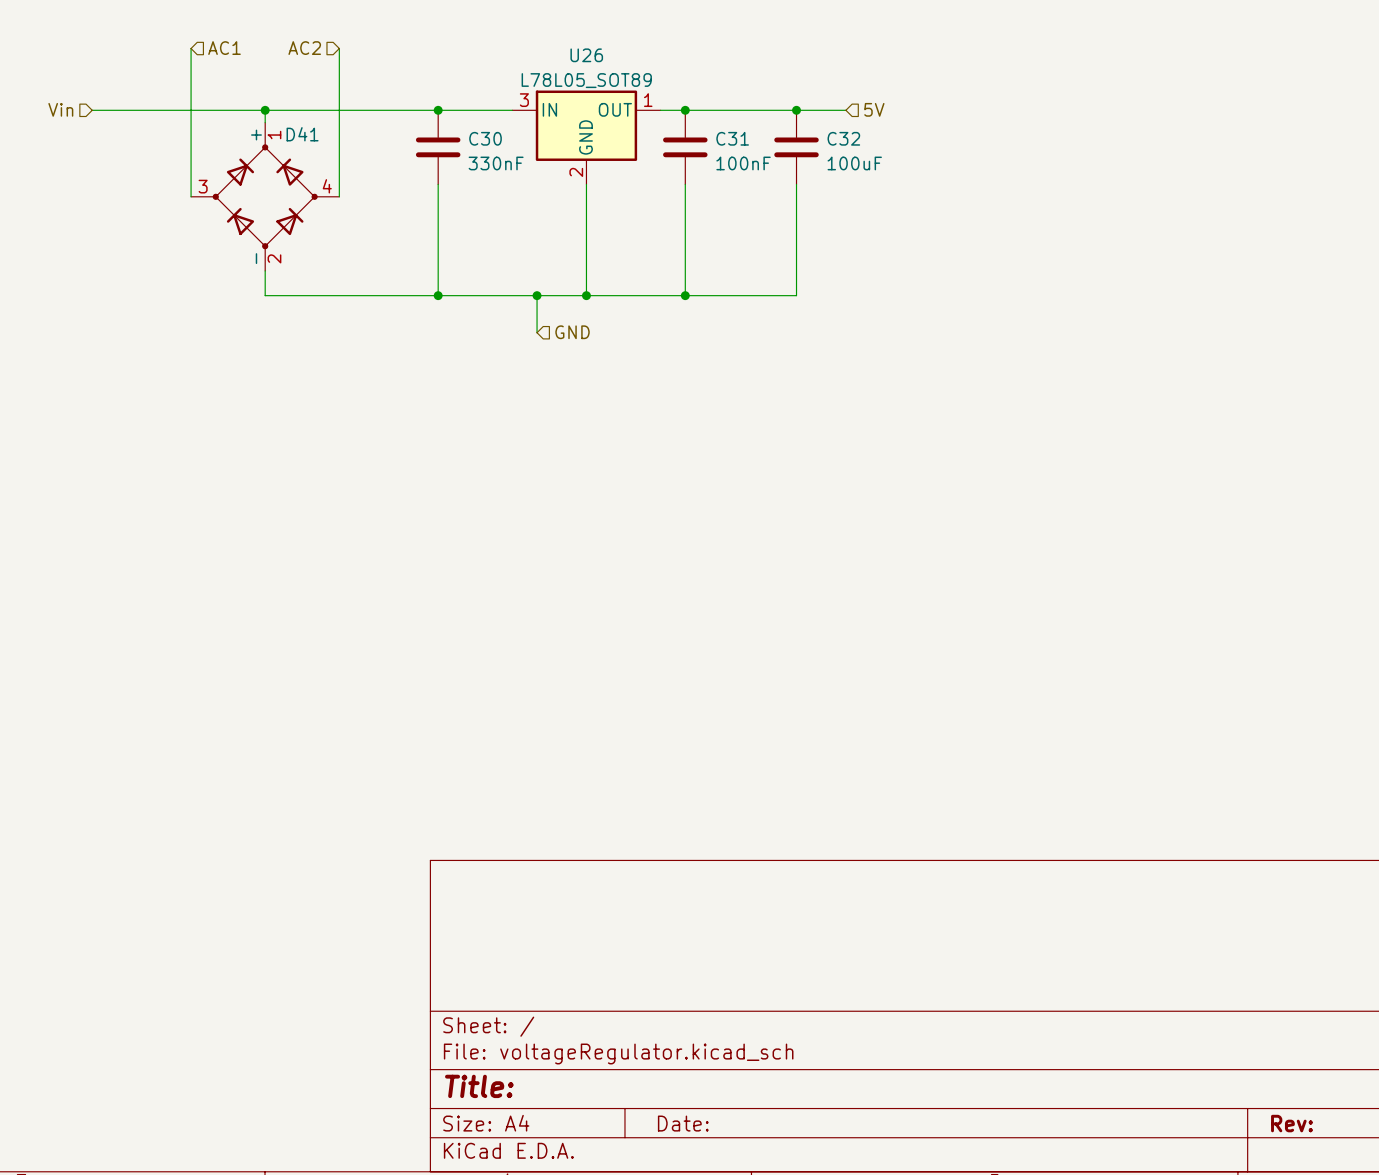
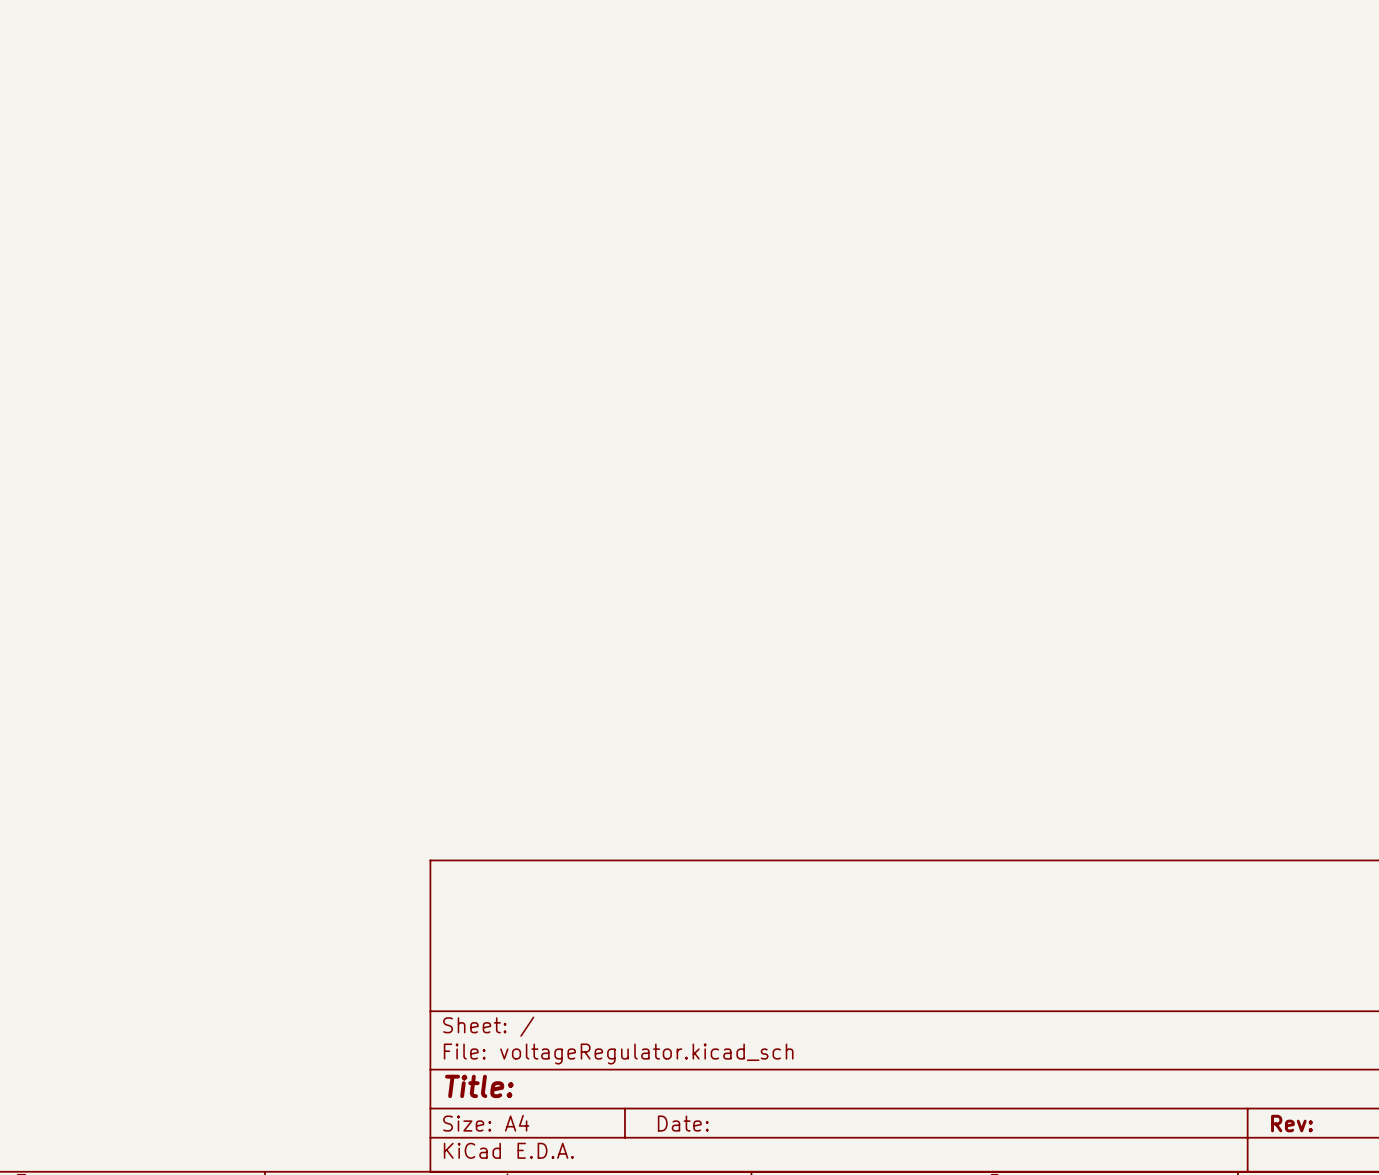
wire: (191, 48) (191, 196) -> none
hierarchical label: AC1 (224, 48) -> none
hierarchical label: AC2 (304, 48) -> none
wire: (339, 48) (339, 196) -> none
hierarchical label: Vin (60, 109) -> none
hierarchical label: 5V (874, 109) -> none
wire: (92, 110) (512, 110) -> none
wire: (265, 110) (265, 122) -> none
junction: (265, 110) -> none
junction: (438, 110) -> none
wire: (660, 110) (845, 110) -> none
junction: (685, 110) -> none
junction: (796, 110) -> none
U26: L78L05_SOT89 (586, 137) -> none
C30: 330nF (438, 147) -> none
C31: 100nF (685, 147) -> none
C32: 100uF (796, 147) -> none
wire: (438, 184) (438, 295) -> none
wire: (586, 184) (586, 295) -> none
wire: (685, 184) (685, 295) -> none
wire: (796, 184) (796, 295) (265, 295) (265, 270) -> none
D41: (265, 196) -> none
junction: (438, 295) -> none
wire: (537, 295) (537, 332) -> none
junction: (537, 295) -> none
junction: (586, 295) -> none
junction: (685, 295) -> none
hierarchical label: GND (572, 332) -> none

